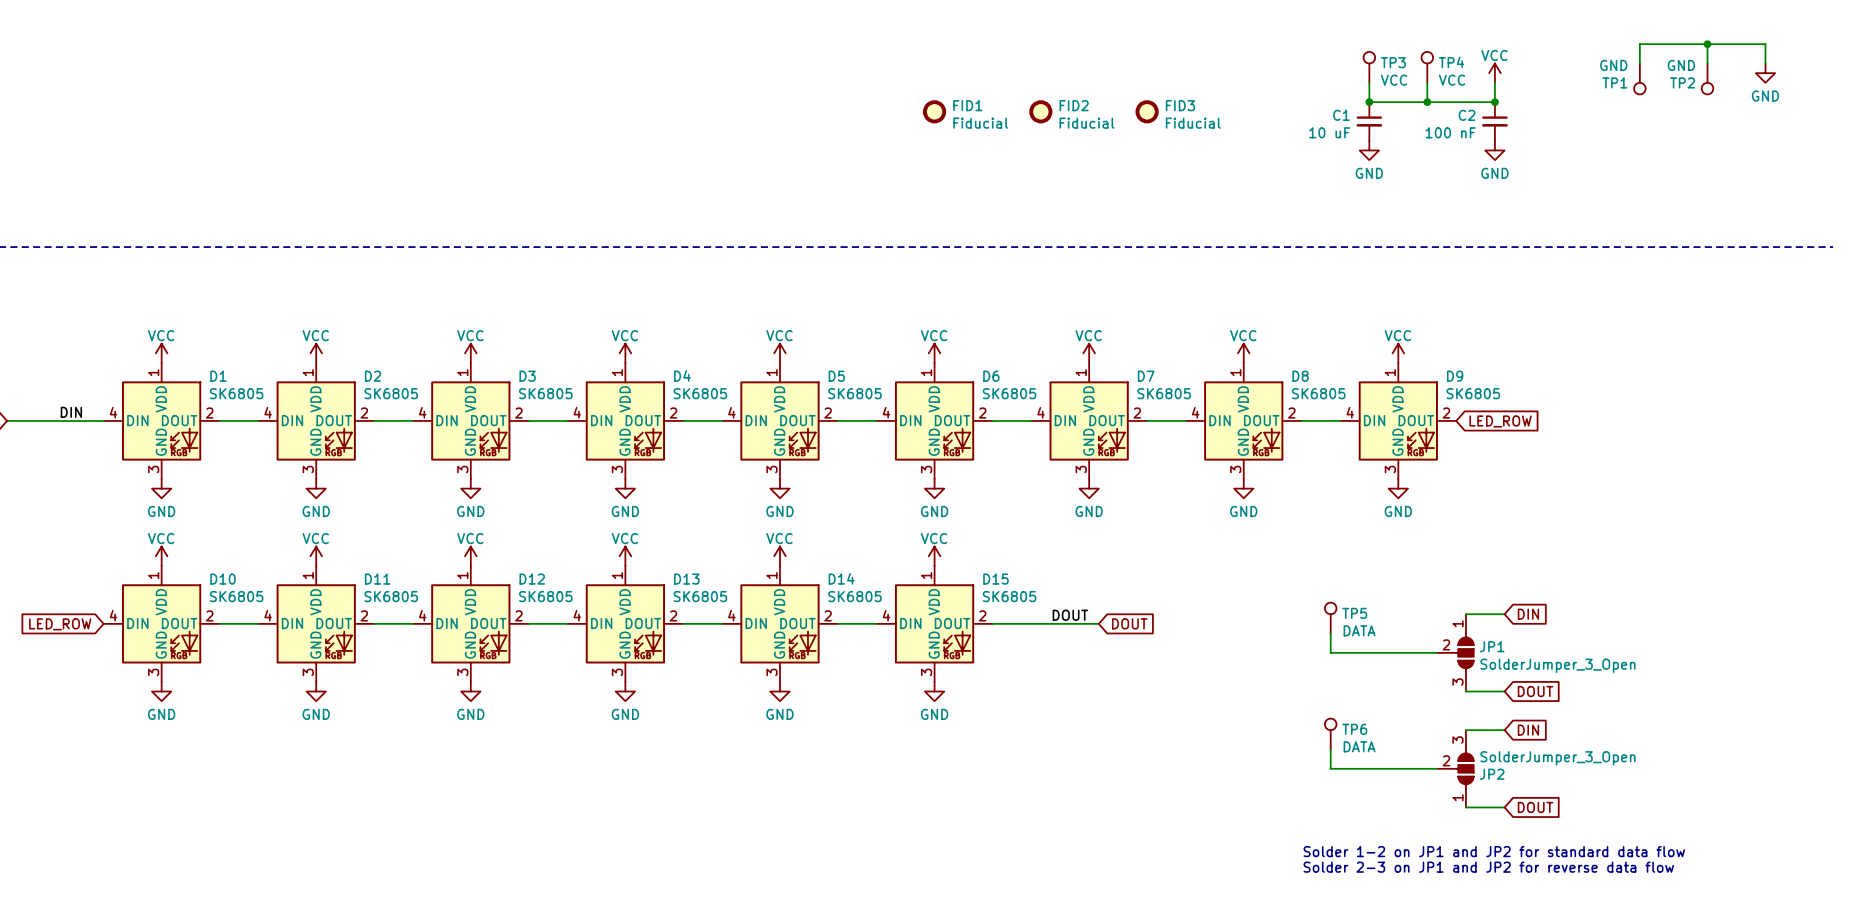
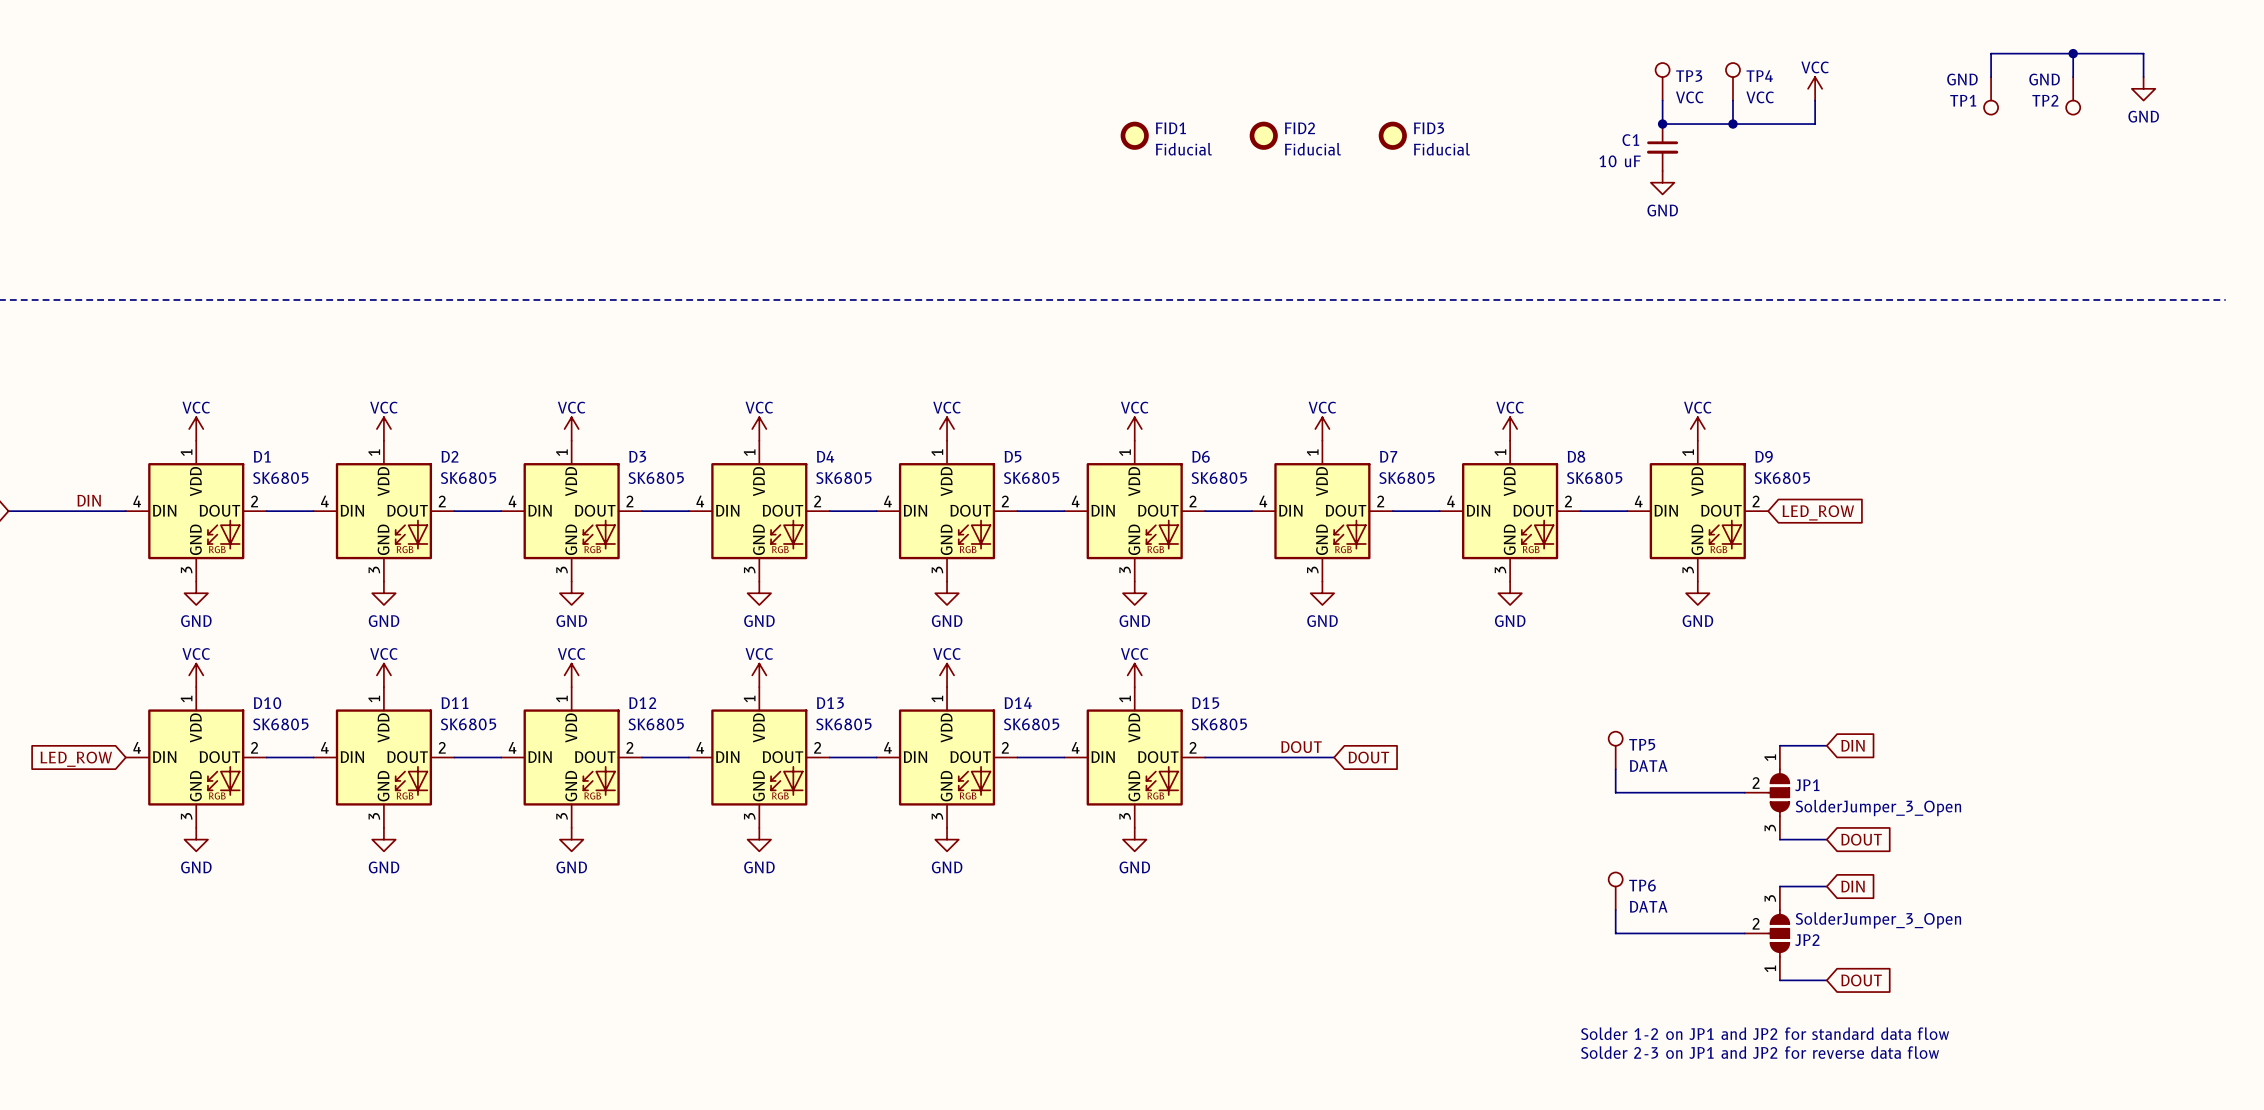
junction: (1494, 102) -> none
C2: 100 nF (1494, 121) -> none
power symbol: GND (1494, 150) -> none

